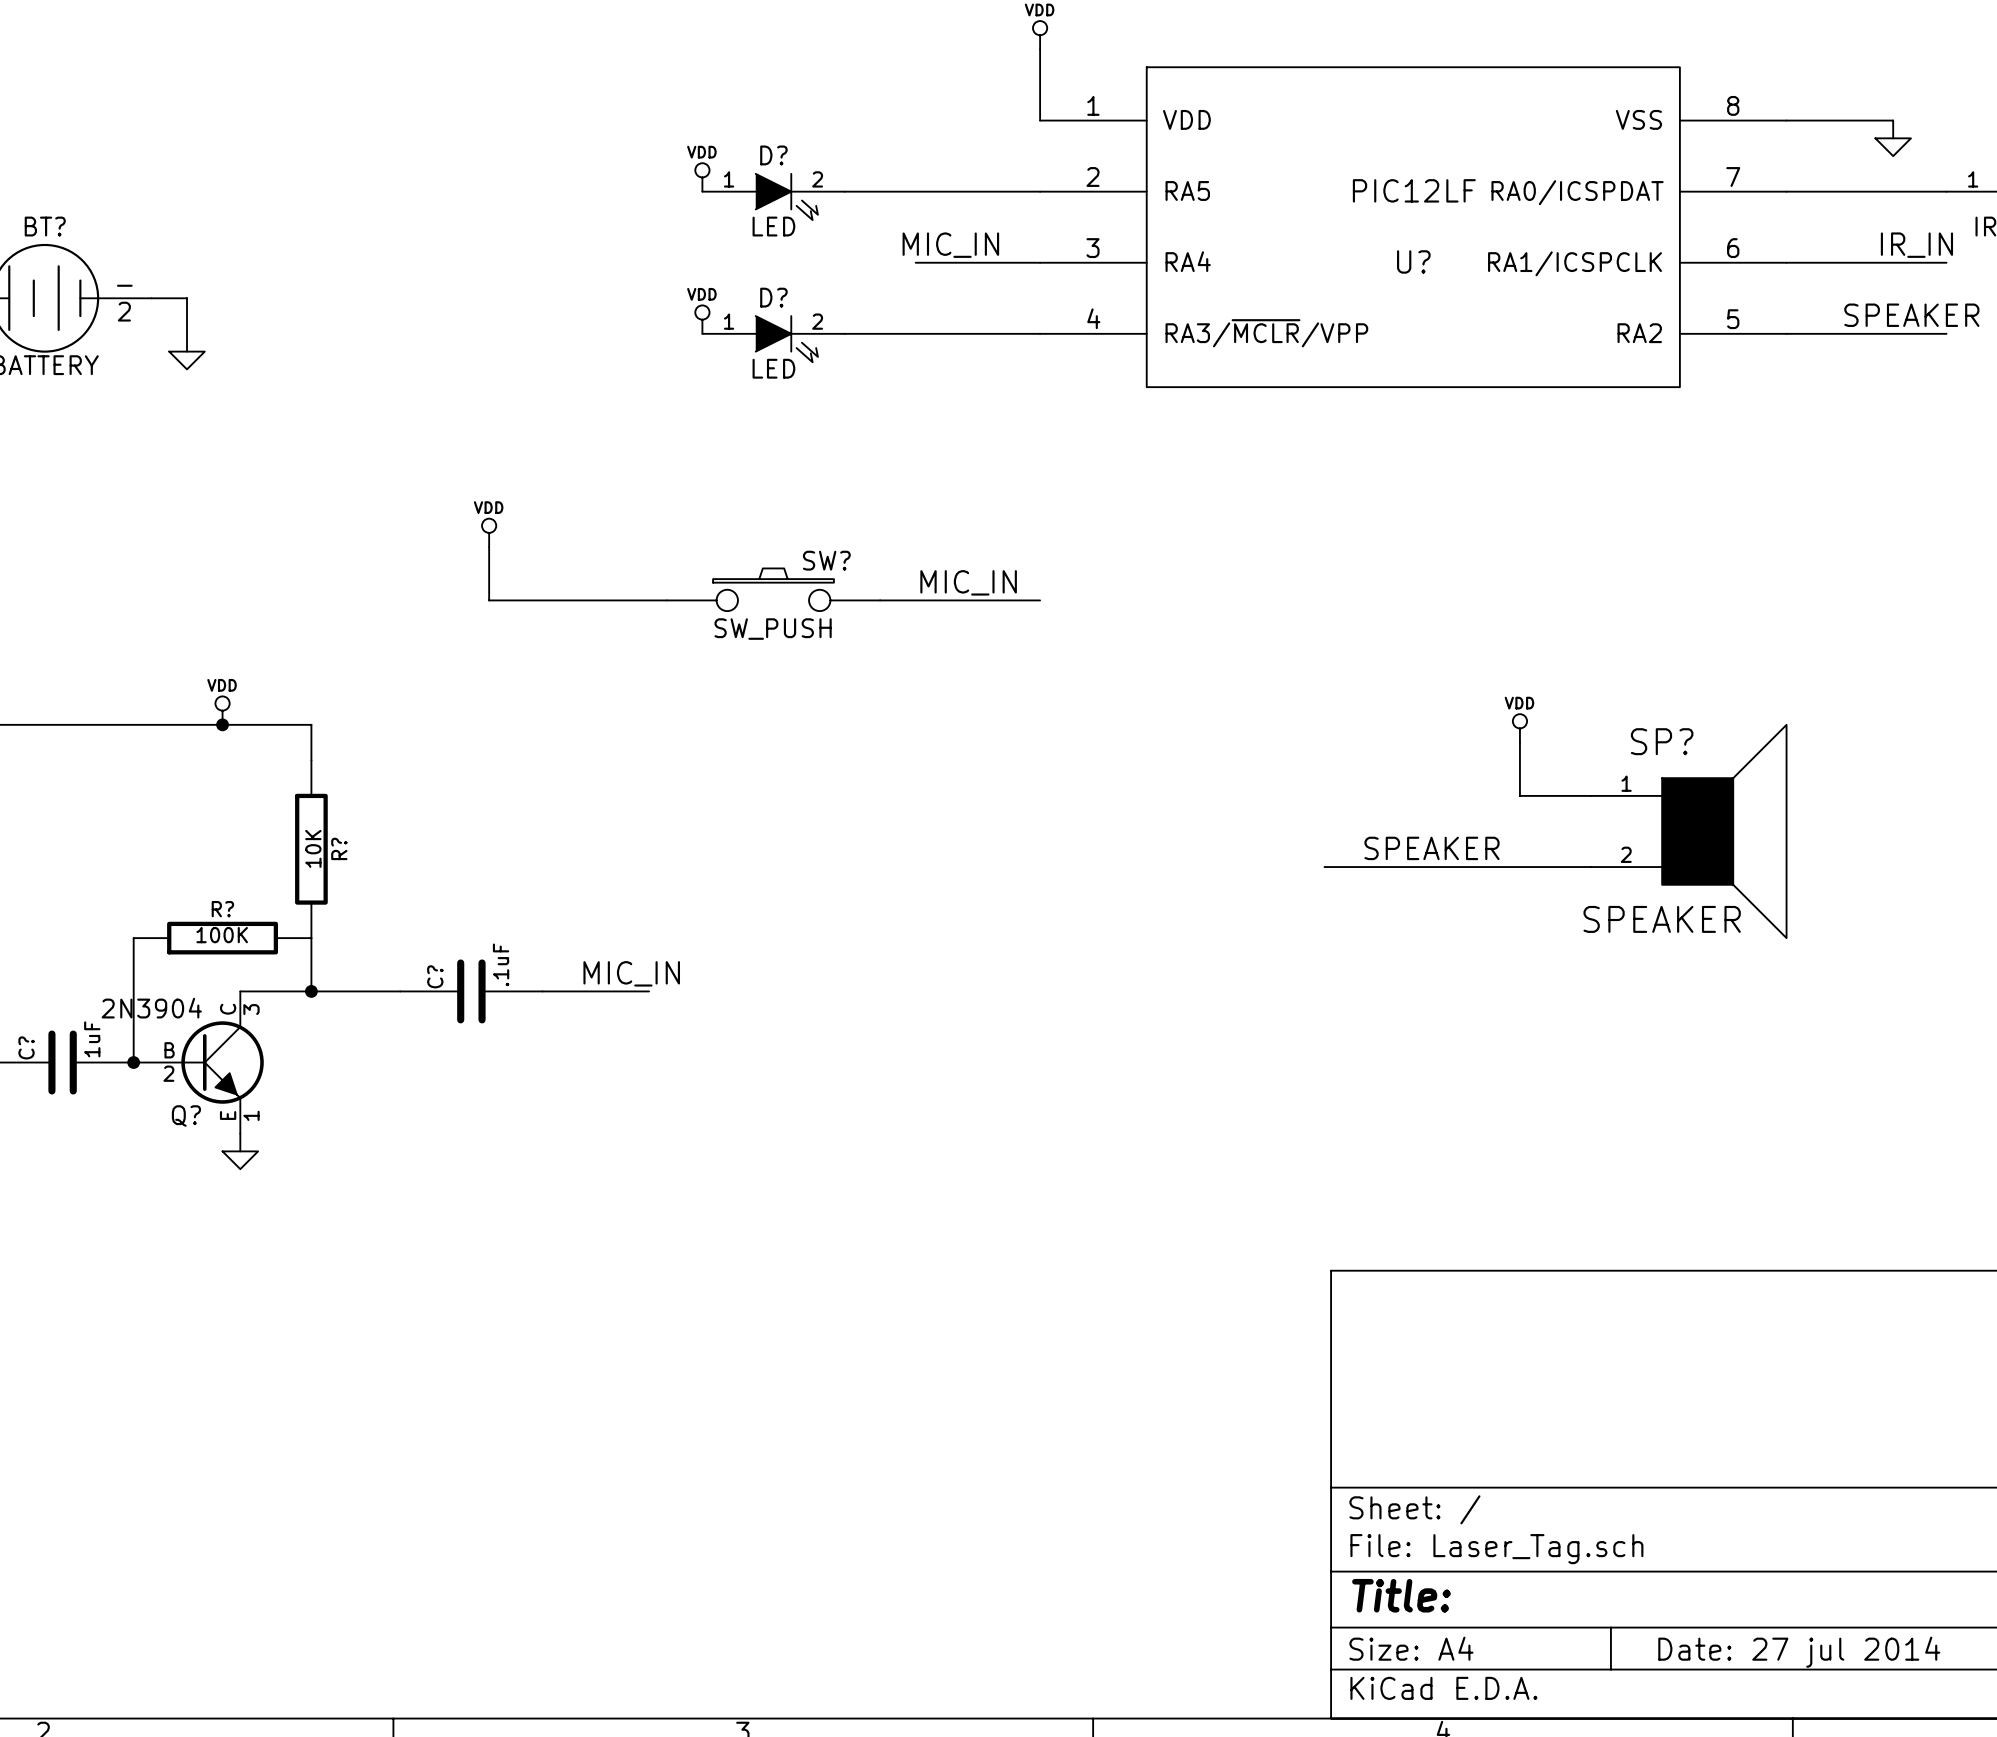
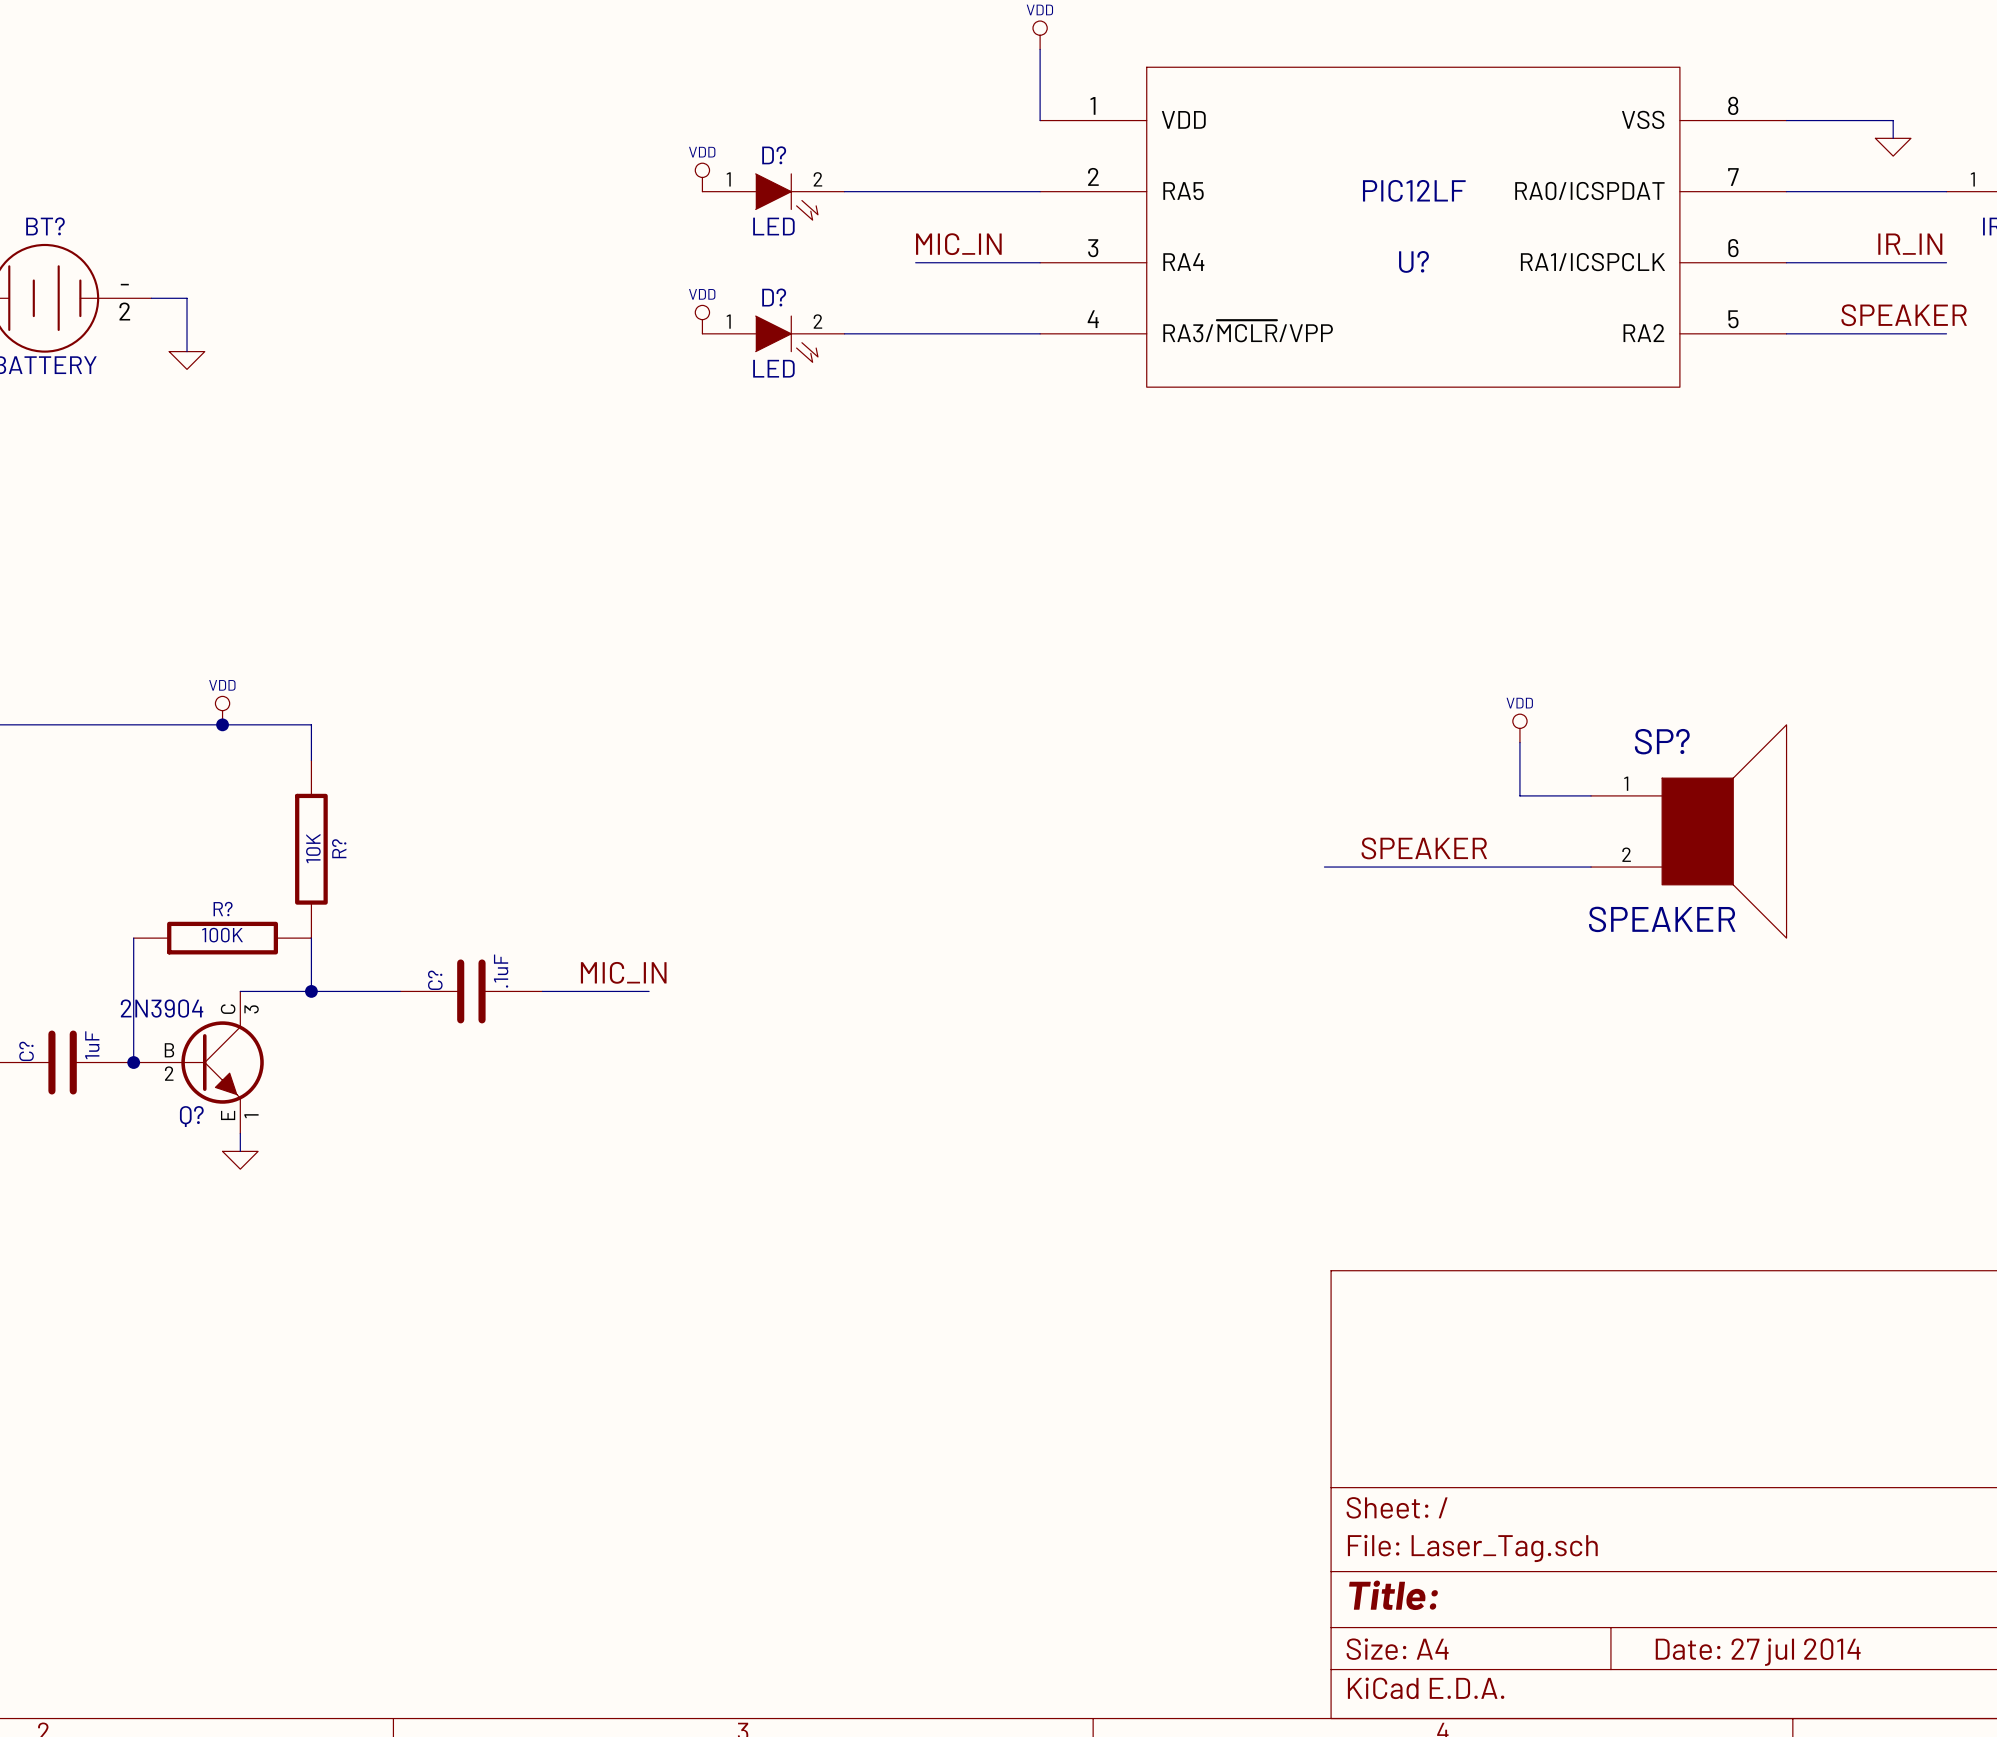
power symbol: VDD (489, 532) -> none
wire: (489, 547) (489, 600) (666, 600) -> none
label: MIC_IN (968, 582) -> none
SW?: SW_PUSH (773, 589) -> none
wire: (880, 600) (1040, 600) -> none

